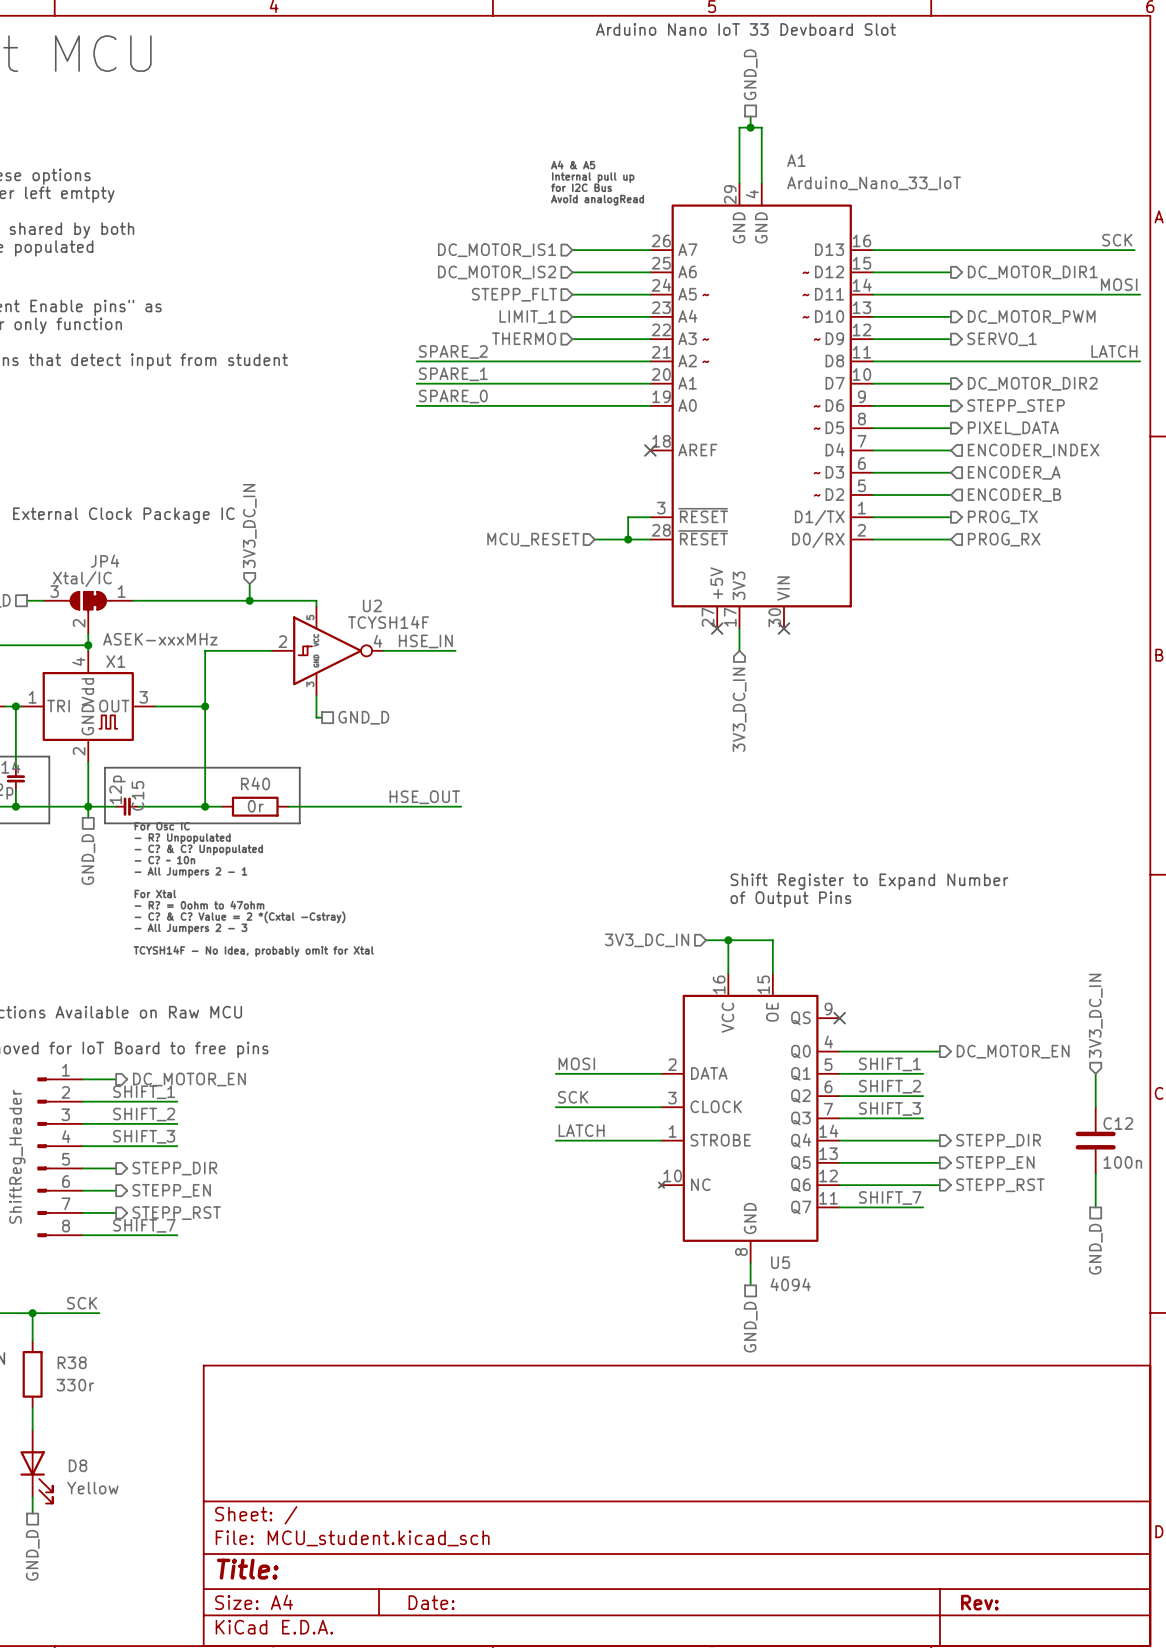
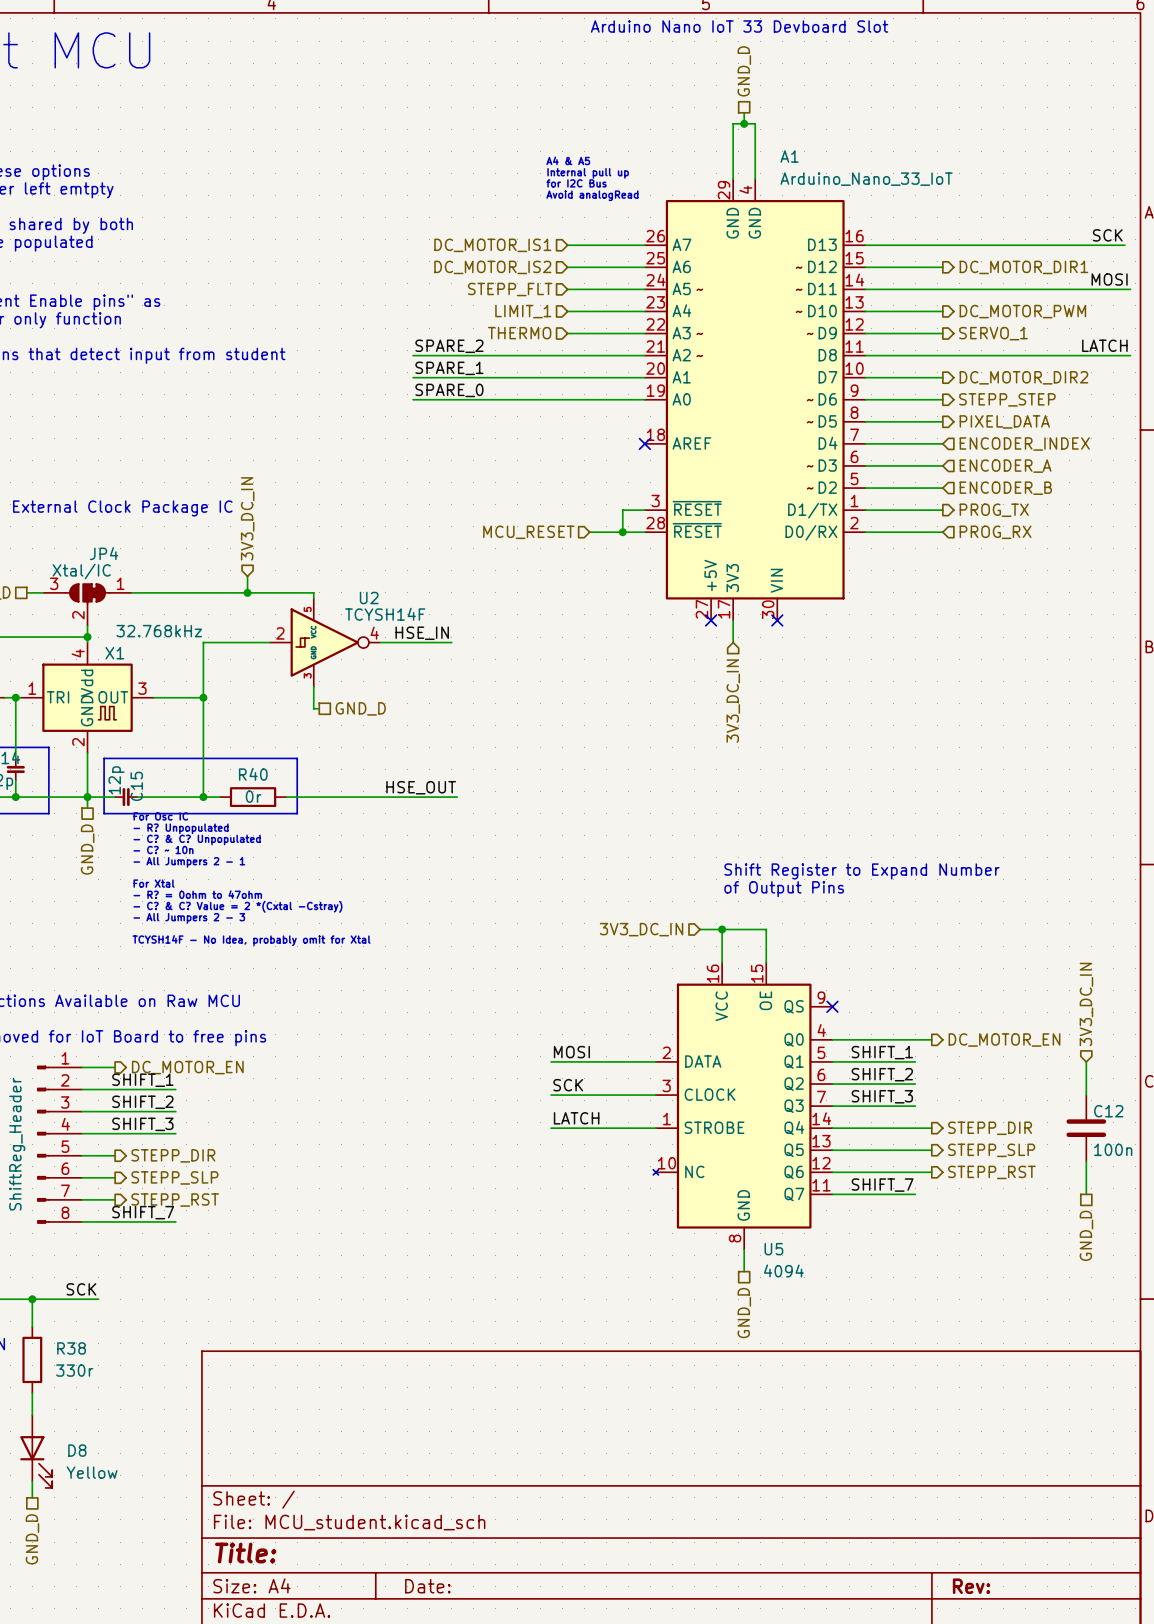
X1 value: ASEK-xxxMHz (160, 639) -> 32.768kHz (159, 631)
hierarchical label: STEPP_EN (995, 1163) -> STEPP_SLP (991, 1150)
hierarchical label: STEPP_EN (171, 1190) -> STEPP_SLP (174, 1177)

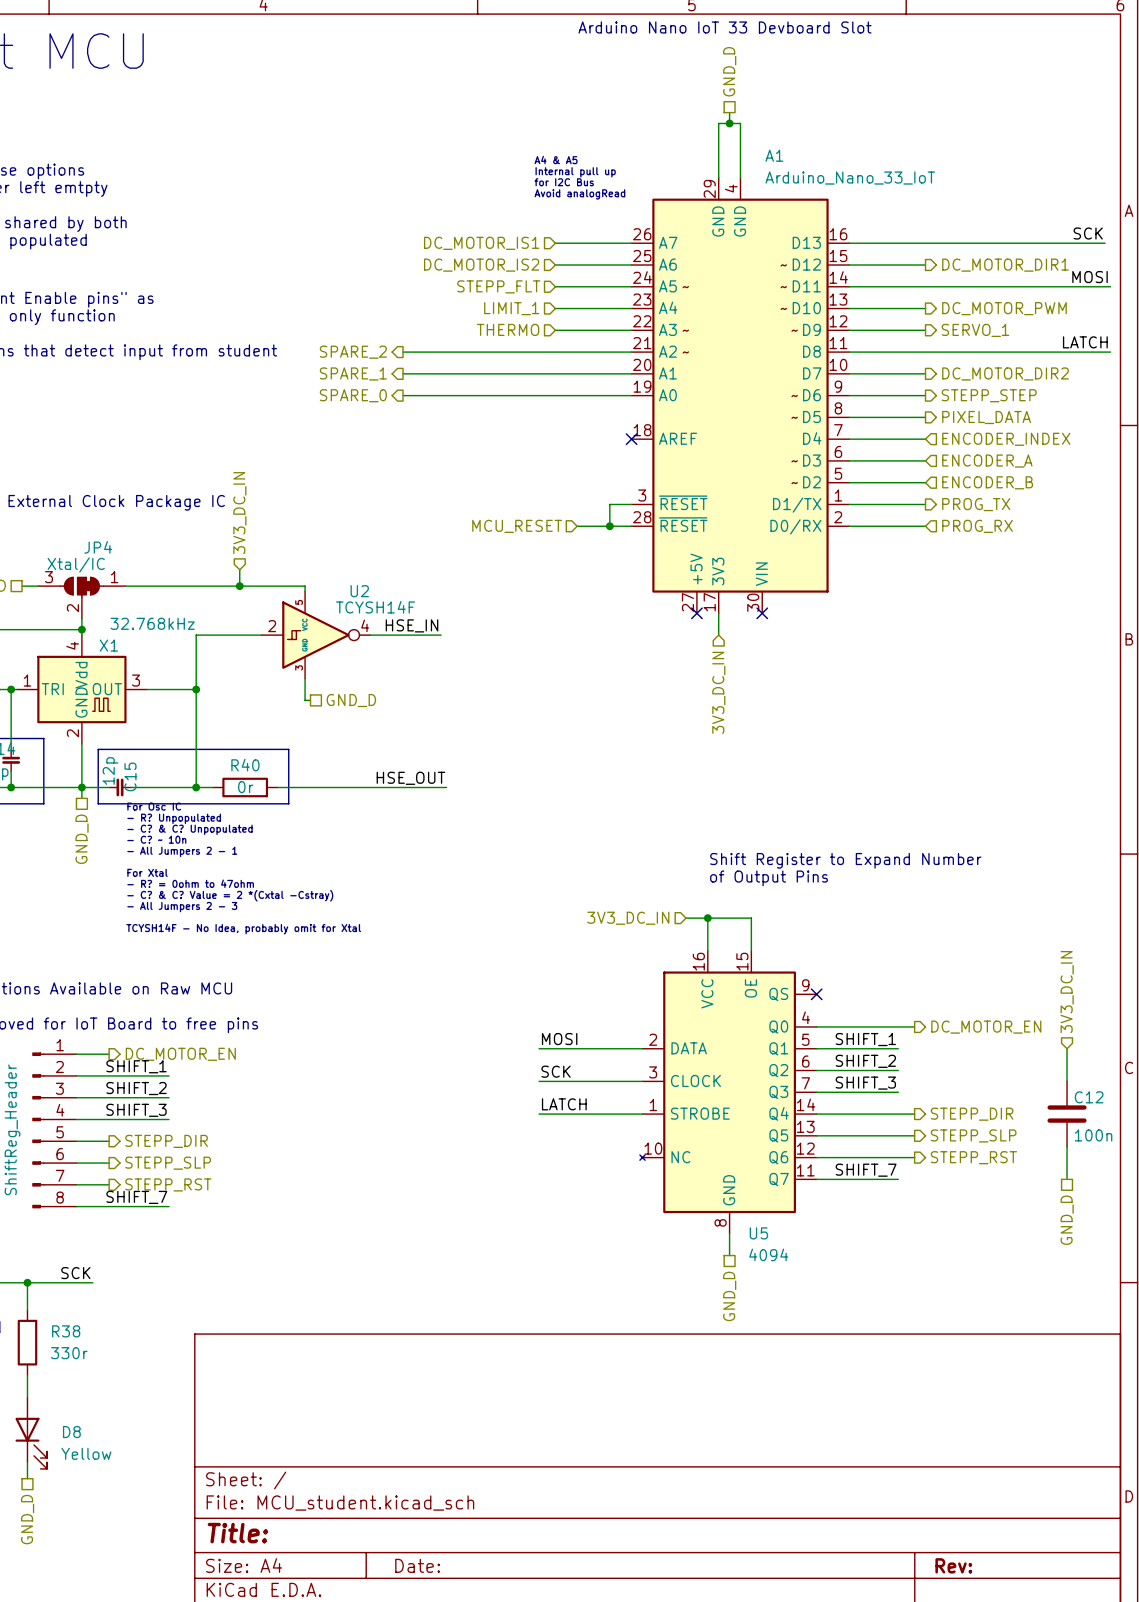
label: SPARE_2 (449, 346) -> none
hierarchical label: none -> SPARE_2 (353, 352)
label: SPARE_1 (449, 368) -> none
hierarchical label: none -> SPARE_1 (353, 373)
label: SPARE_0 (449, 390) -> none
hierarchical label: none -> SPARE_0 (353, 395)

